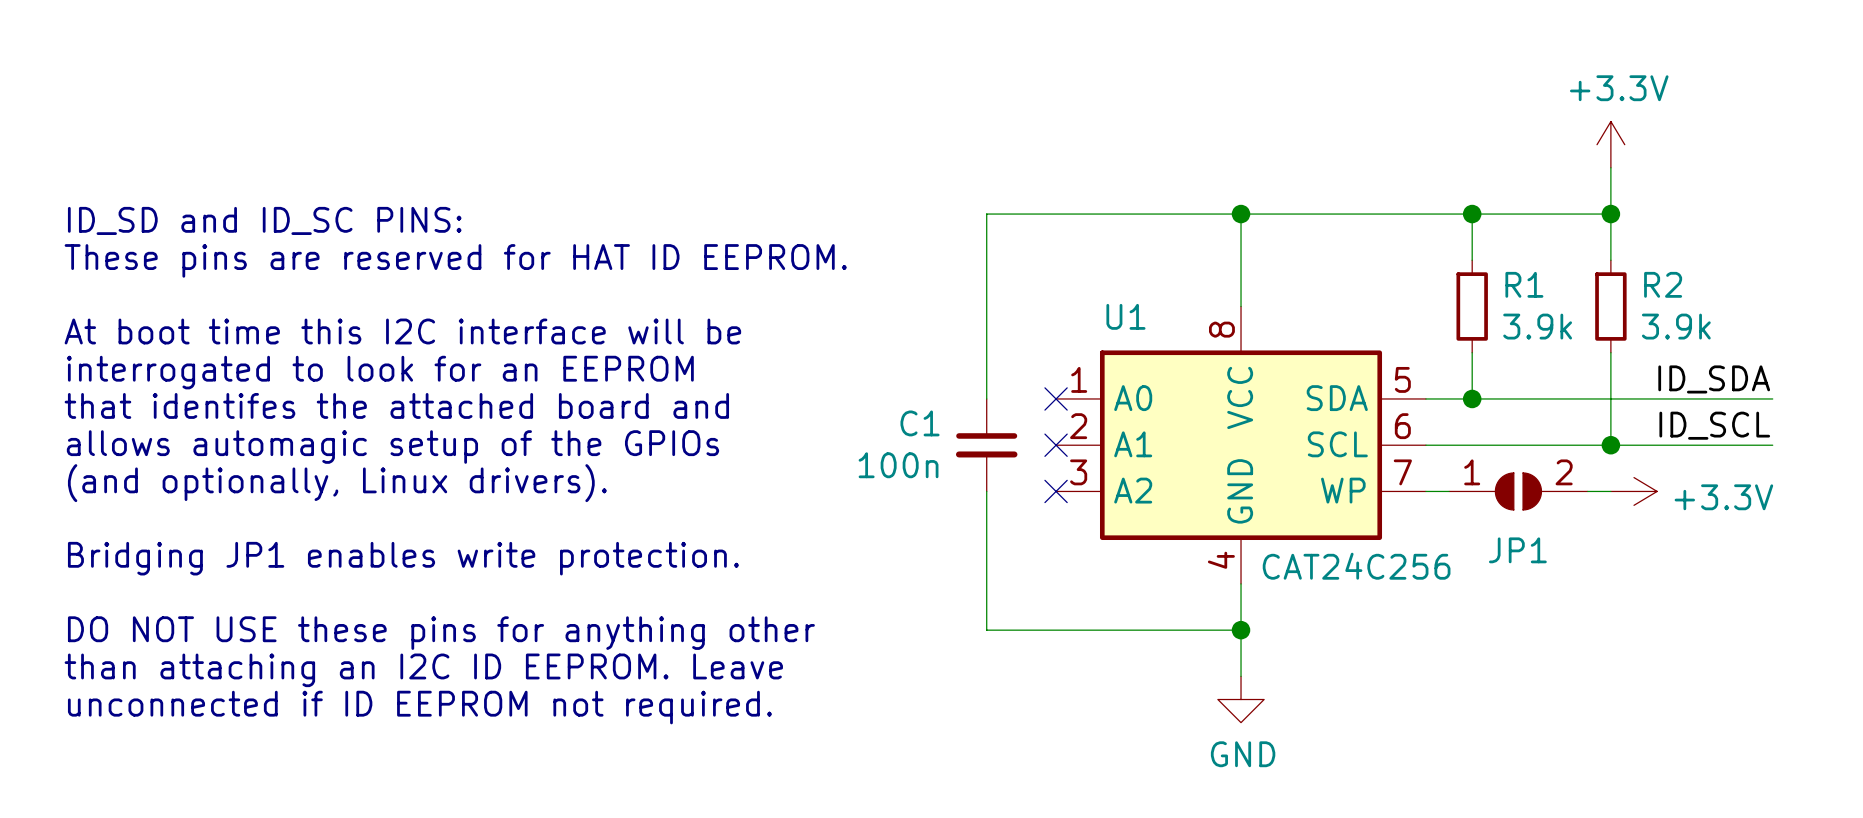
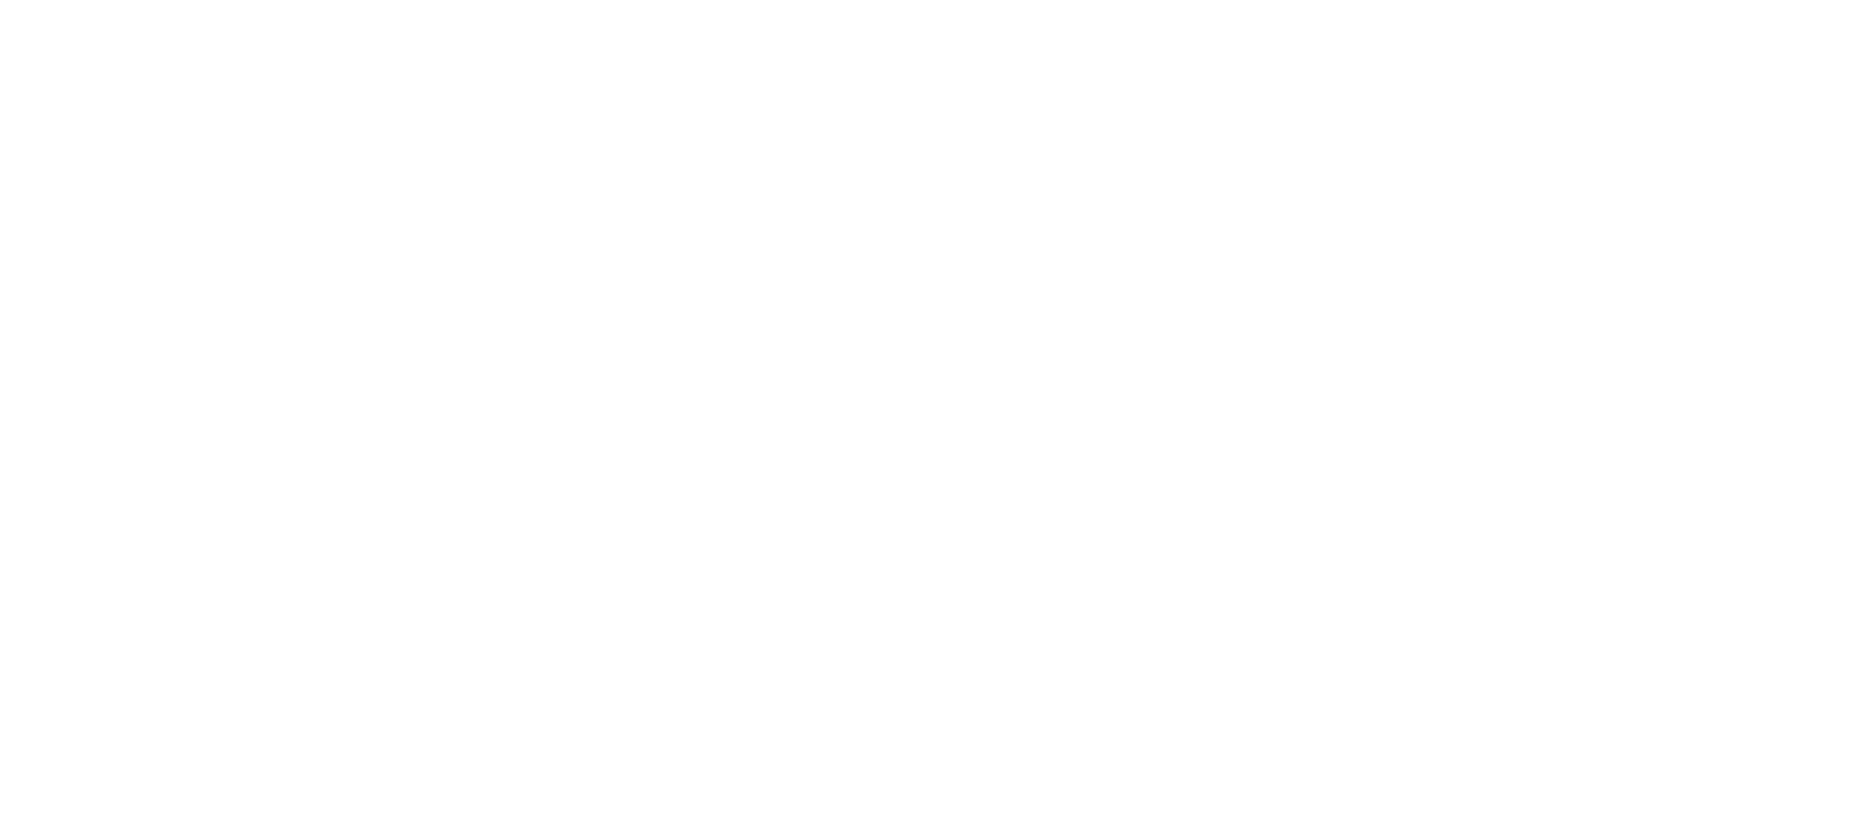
power symbol: +3.3V (1610, 144) -> none
wire: (1610, 167) (1610, 260) -> none
wire: (1241, 214) (1241, 306) -> none
junction: (1241, 214) -> none
wire: (1472, 214) (1472, 260) -> none
junction: (1472, 214) -> none
wire: (1610, 214) (986, 214) (986, 398) -> none
junction: (1610, 214) -> none
text: ID_SD and ID_SC PINS: (264, 220) -> none
text: These pins are reserved for HAT ID EEPROM. (455, 260) -> none
R1: 3.9k (1472, 306) -> none
R2: 3.9k (1610, 306) -> none
text: At boot time this I2C interface will be (402, 331) -> none
wire: (1472, 352) (1472, 398) -> none
wire: (1610, 352) (1610, 445) -> none
text: interrogated to look for an EEPROM (380, 372) -> none
label: ID_SDA (1714, 379) -> none
no-connect mark: (1056, 398) -> none
wire: (1425, 398) (1772, 398) -> none
junction: (1472, 398) -> none
text: that identifes the attached board and (396, 405) -> none
label: ID_SCL (1714, 425) -> none
C1: 100n (986, 445) -> none
no-connect mark: (1056, 445) -> none
U1: CAT24C256 (1241, 445) -> none
wire: (1425, 445) (1772, 445) -> none
junction: (1610, 445) -> none
text: allows automagic setup of the GPIOs (392, 447) -> none
text: (and optionally, Linux drivers). (337, 483) -> none
wire: (986, 491) (986, 630) (1241, 630) -> none
no-connect mark: (1056, 491) -> none
wire: (1425, 491) (1449, 491) -> none
JP1: (1518, 491) -> none
wire: (1587, 491) (1610, 491) -> none
power symbol: +3.3V (1634, 491) -> none
text: Bridging JP1 enables write protection. (403, 558) -> none
wire: (1241, 583) (1241, 676) -> none
junction: (1241, 630) -> none
text: DO NOT USE these pins for anything other (441, 633) -> none
text: than attaching an I2C ID EEPROM. Leave (423, 670) -> none
power symbol: GND (1241, 699) -> none
text: unconnected if ID EEPROM not required. (419, 707) -> none

